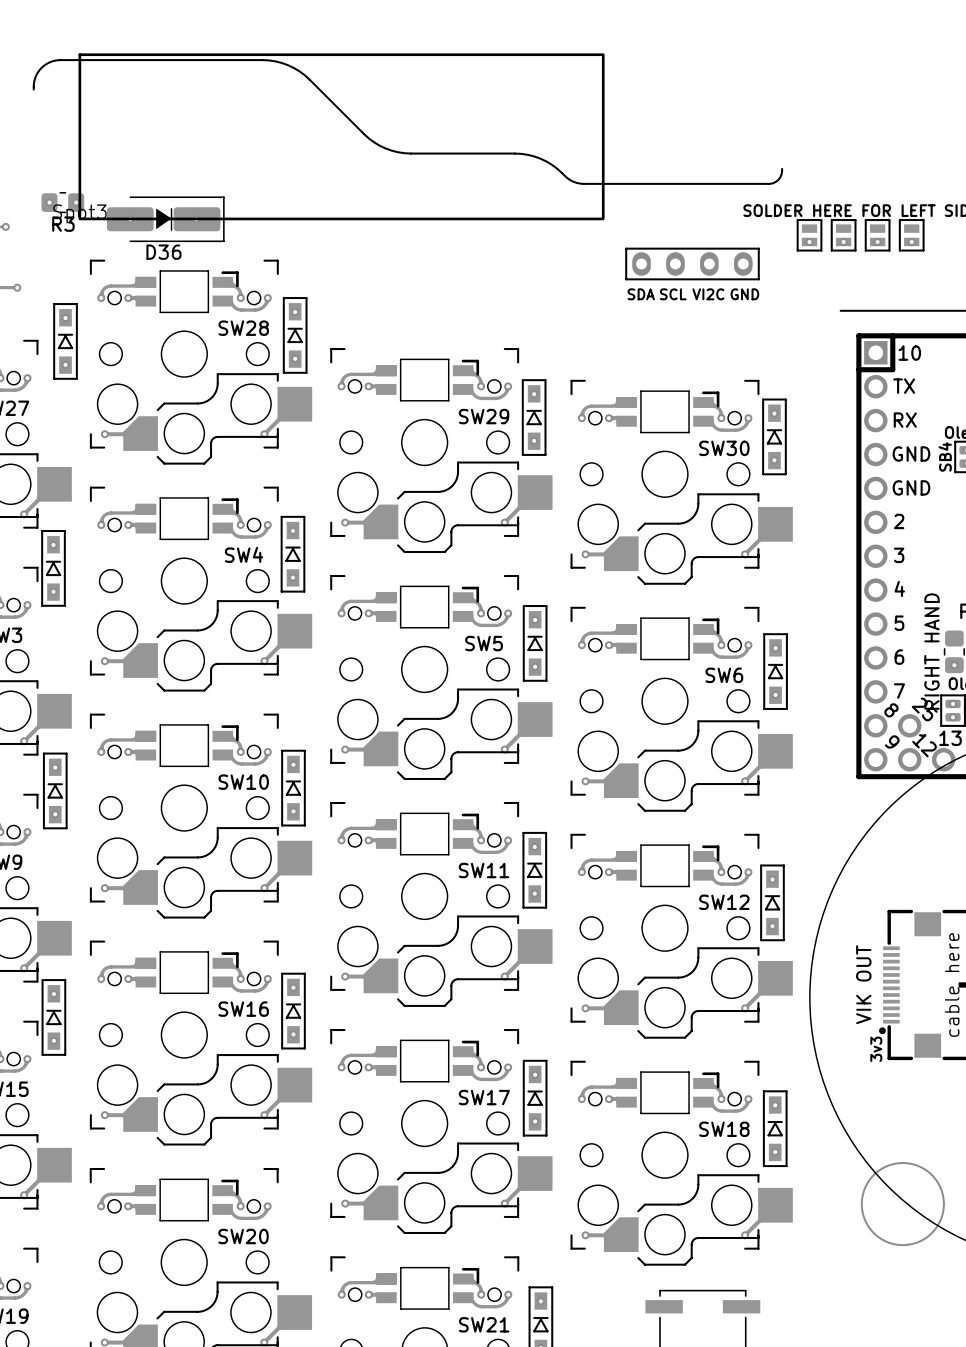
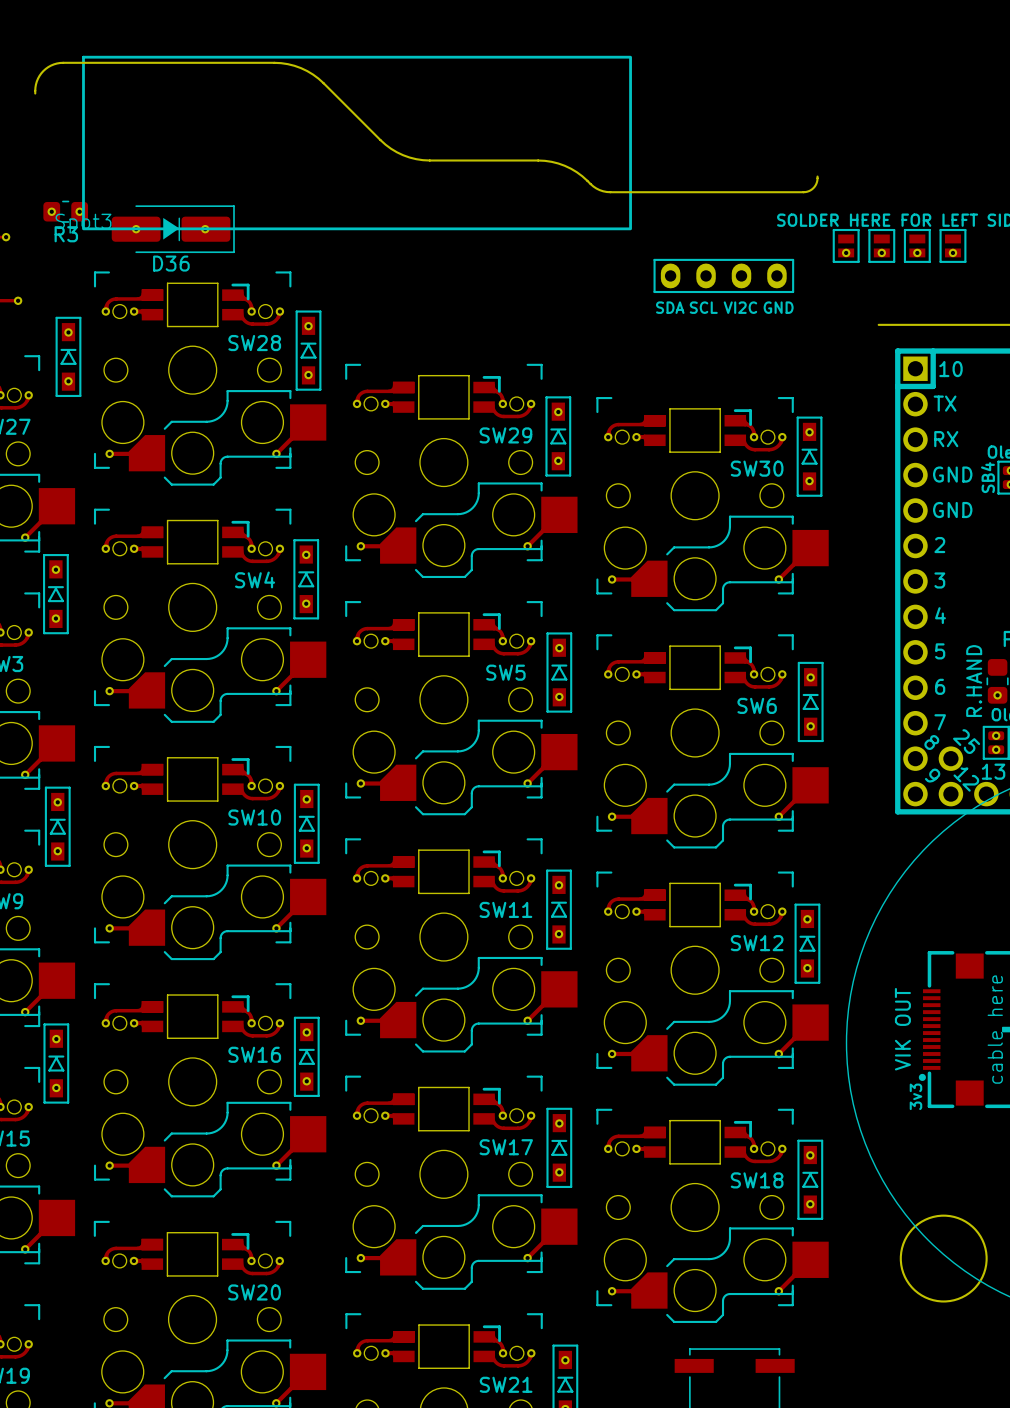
part text: RIGHT HAND (931, 651) -> R.HAND (974, 681)

